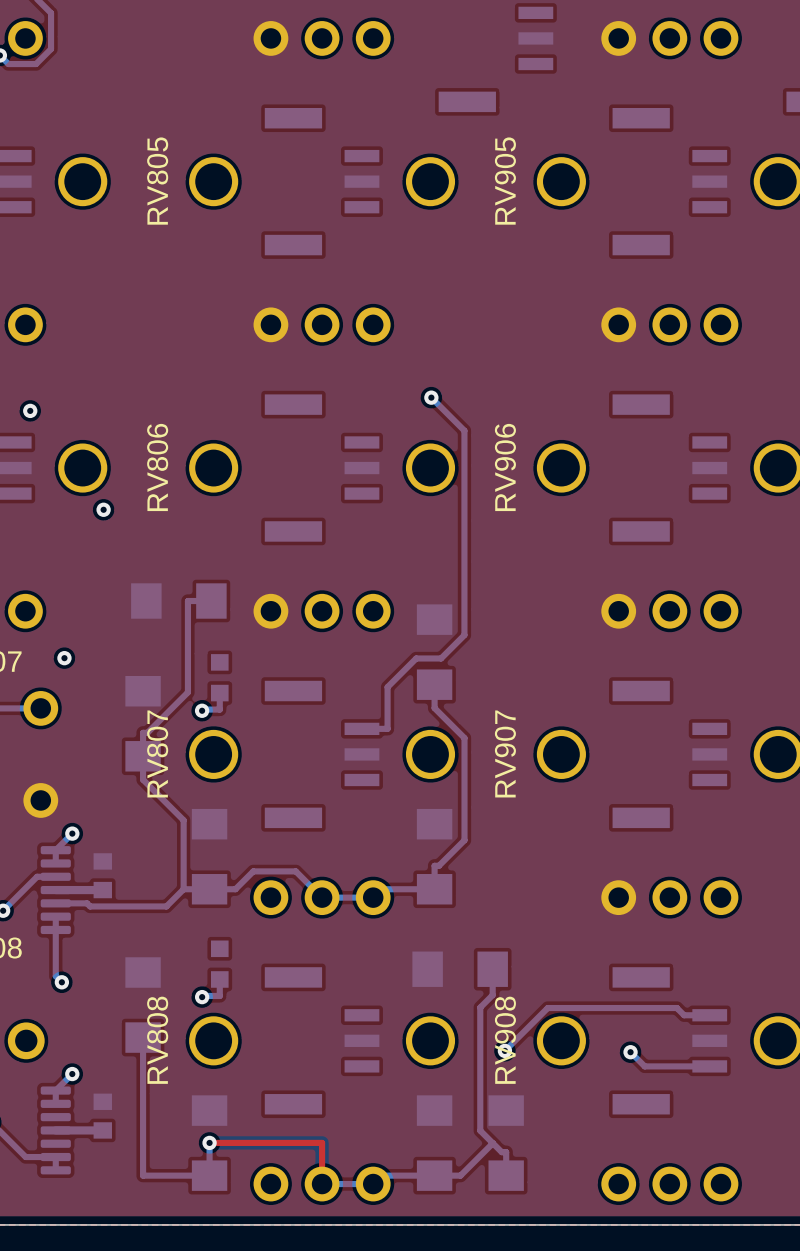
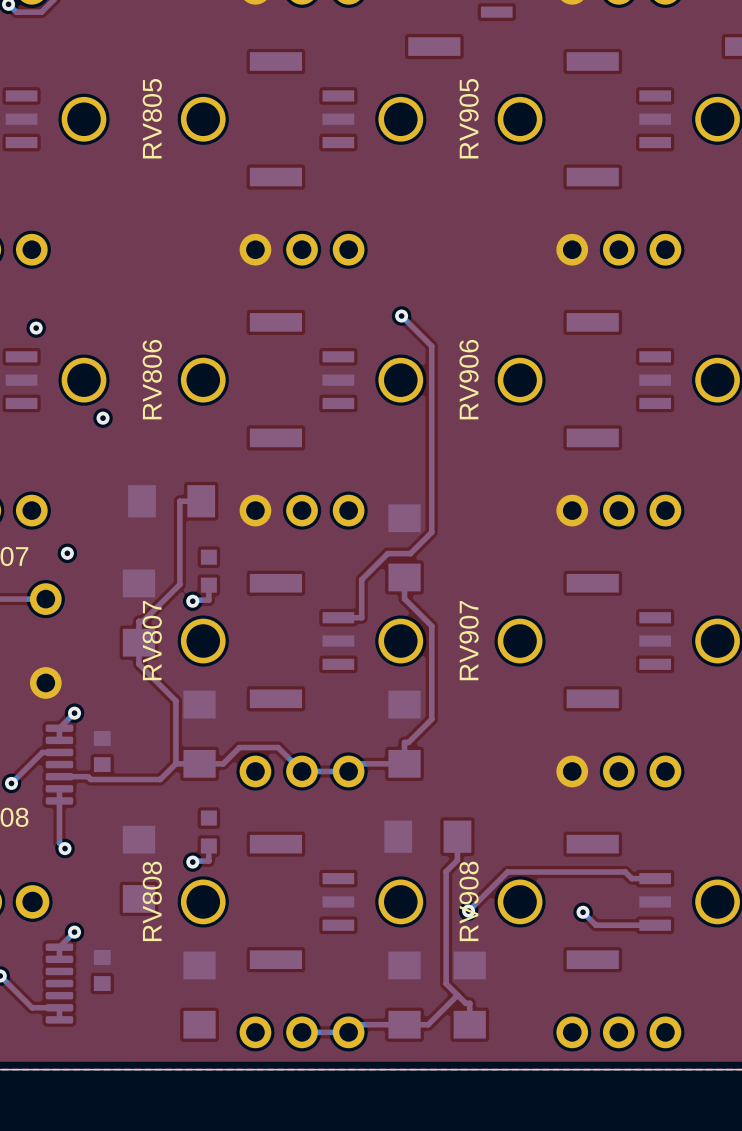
bottom track: (55, 890) (102, 890) -> none
bottom track: (143, 1037) (143, 1175) (209, 1175) (209, 1142) -> none
bottom track: (55, 1130) (102, 1130) -> none
top track: (209, 1142) (322, 1142) (322, 1184) -> none
via: (209, 1142) -> none

